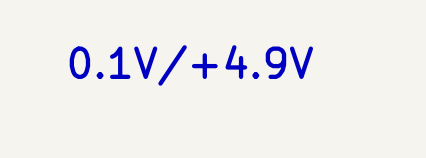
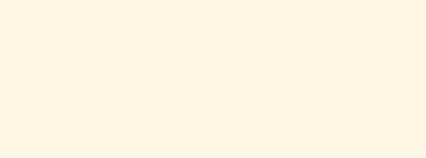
text: 0.1V/+4.9V (191, 65) -> none

